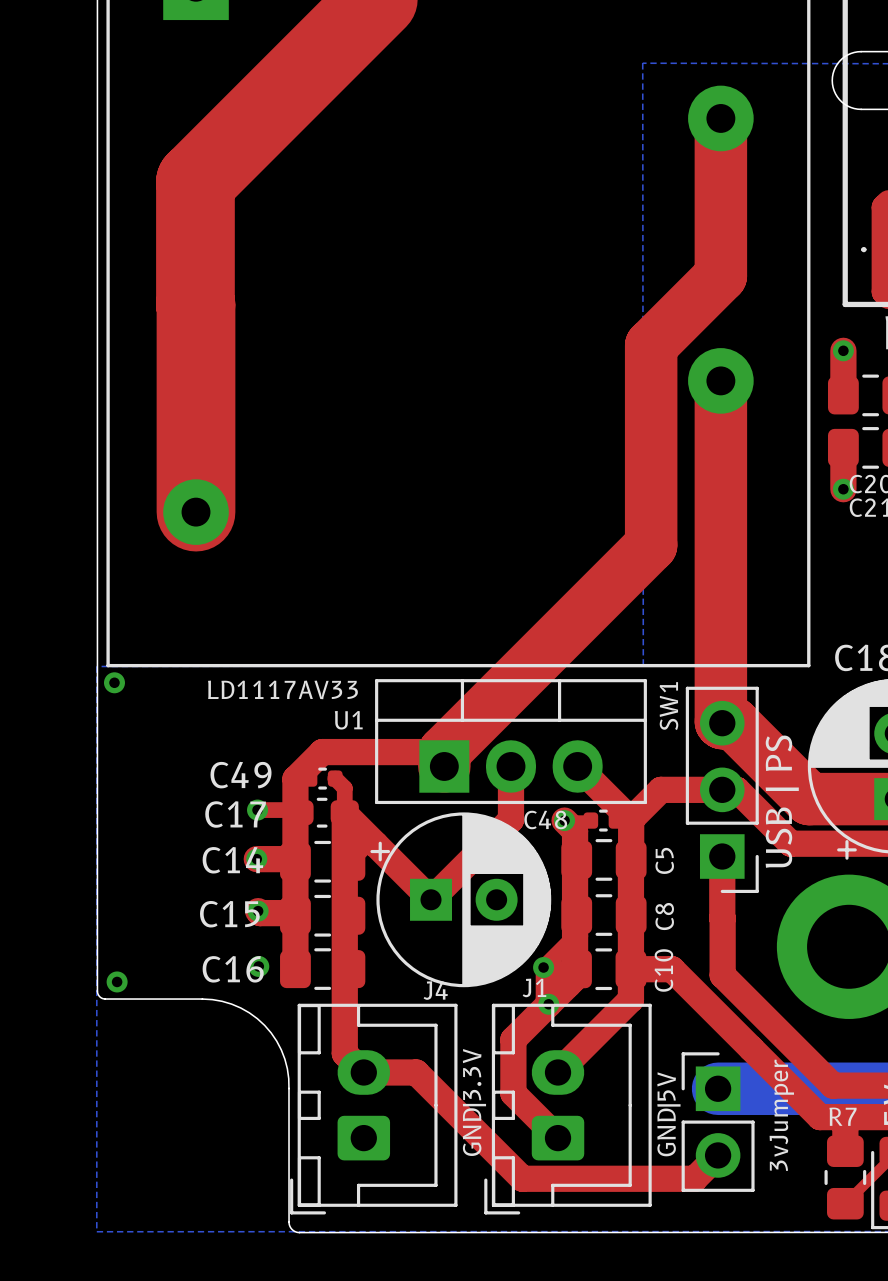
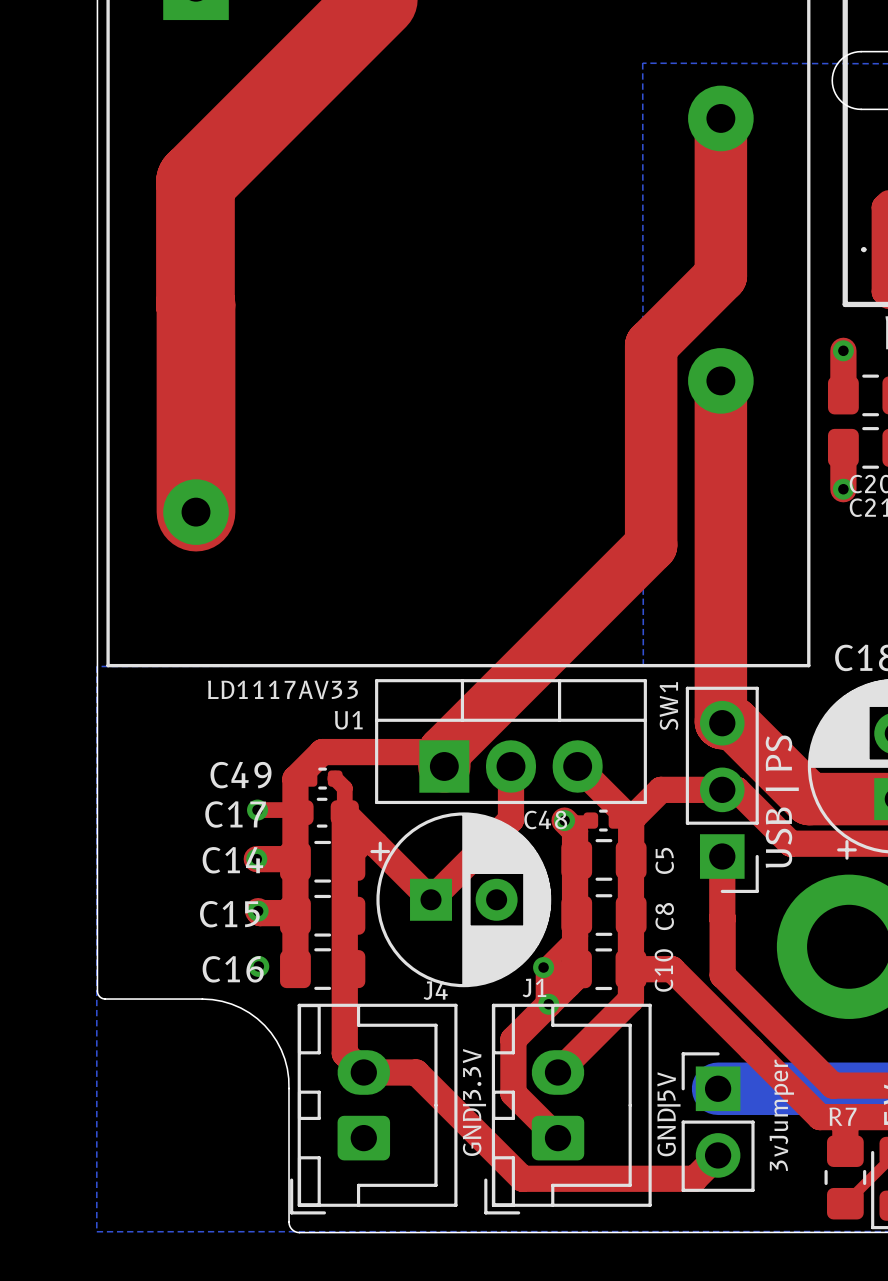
via: (114, 682) -> none
via: (117, 981) -> none

